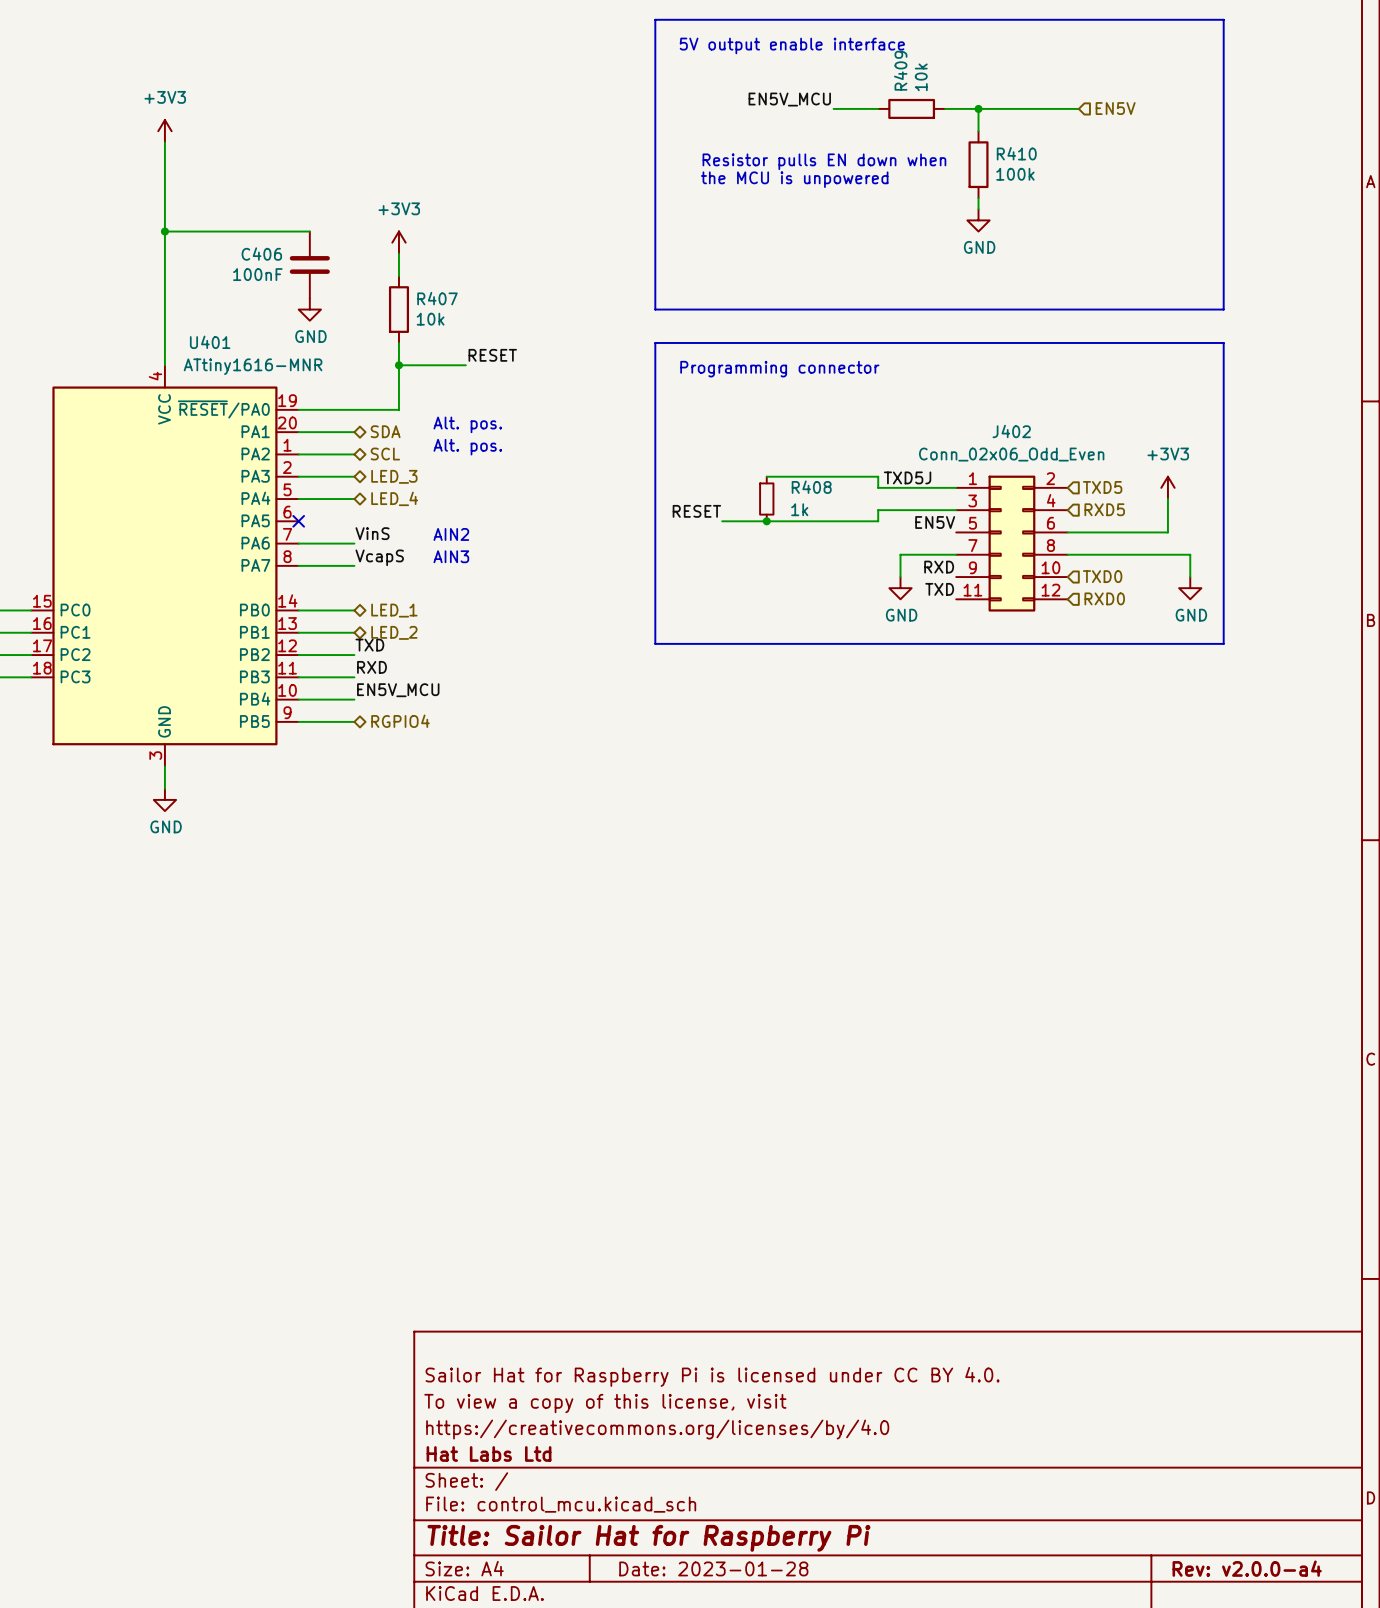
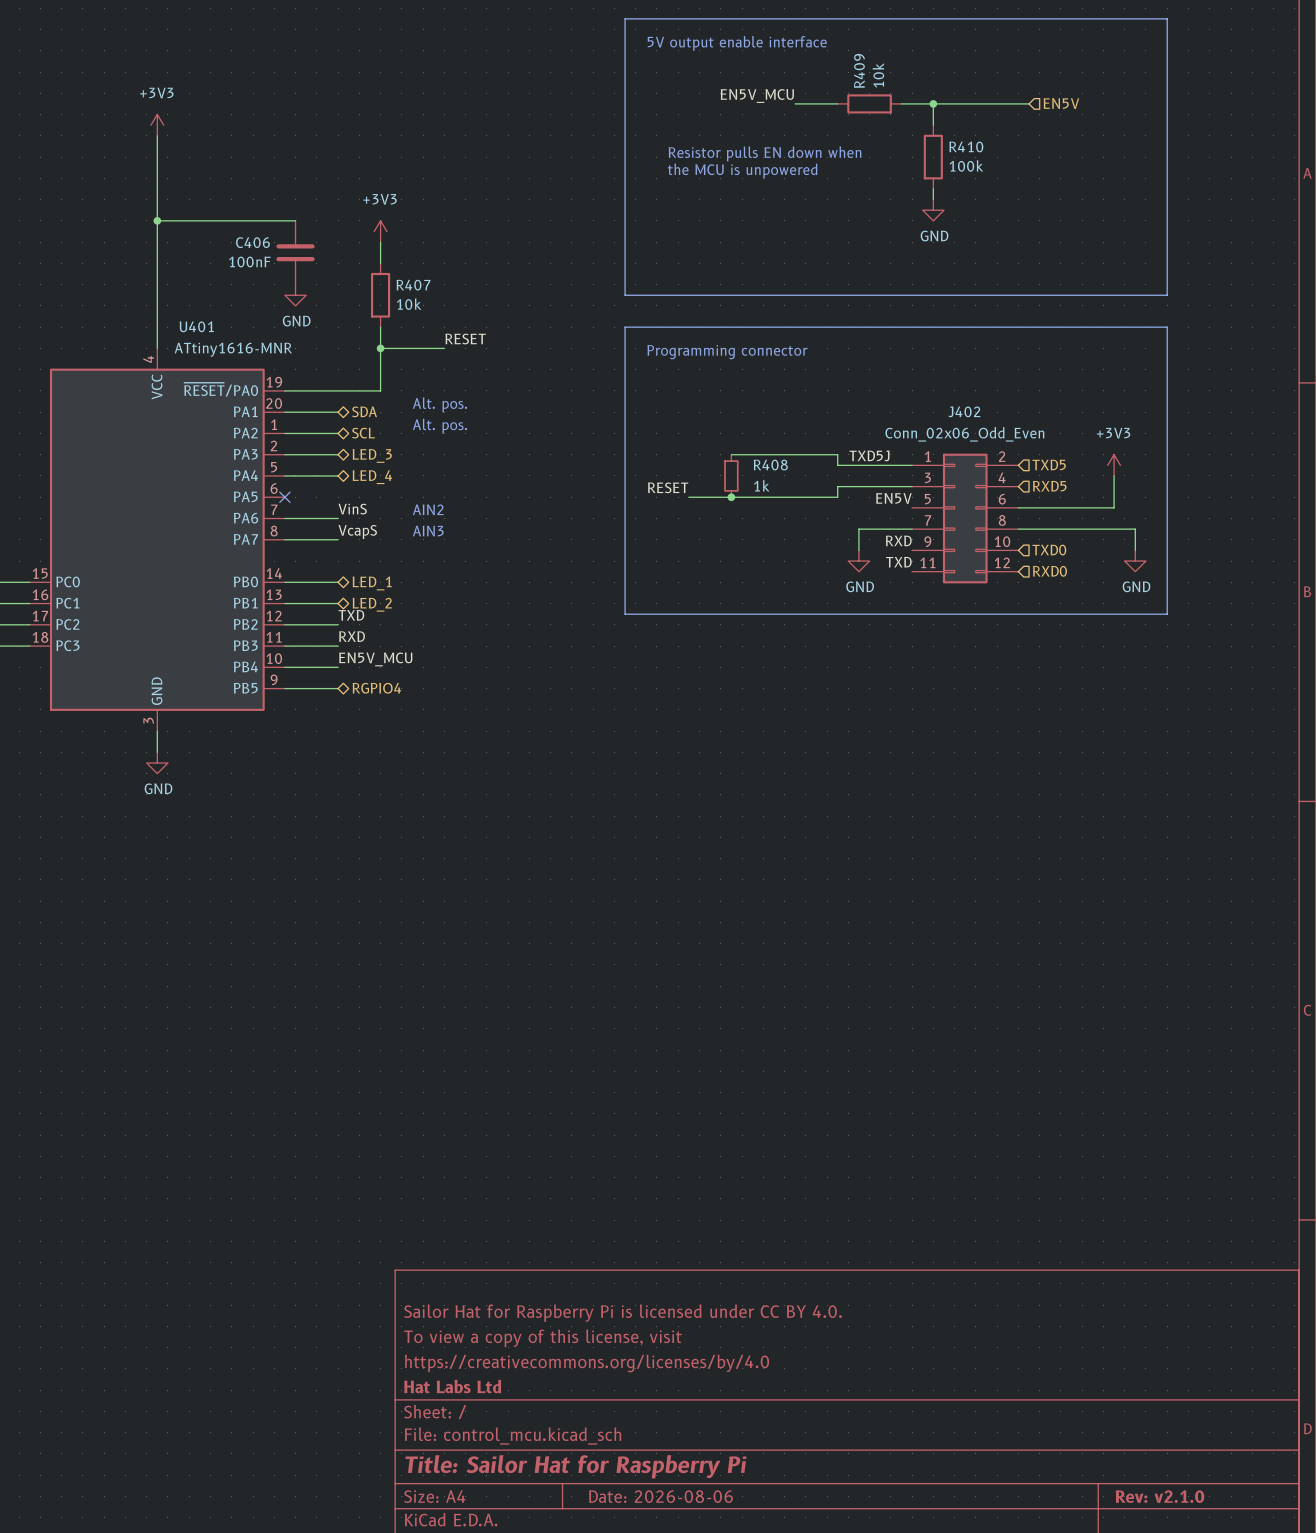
title block: Date: 2023-01-28 (713, 1568) -> Date: 2026-08-06 (660, 1496)
title block: Rev: v2.0.0-a4 (1247, 1568) -> Rev: v2.1.0 (1159, 1496)

